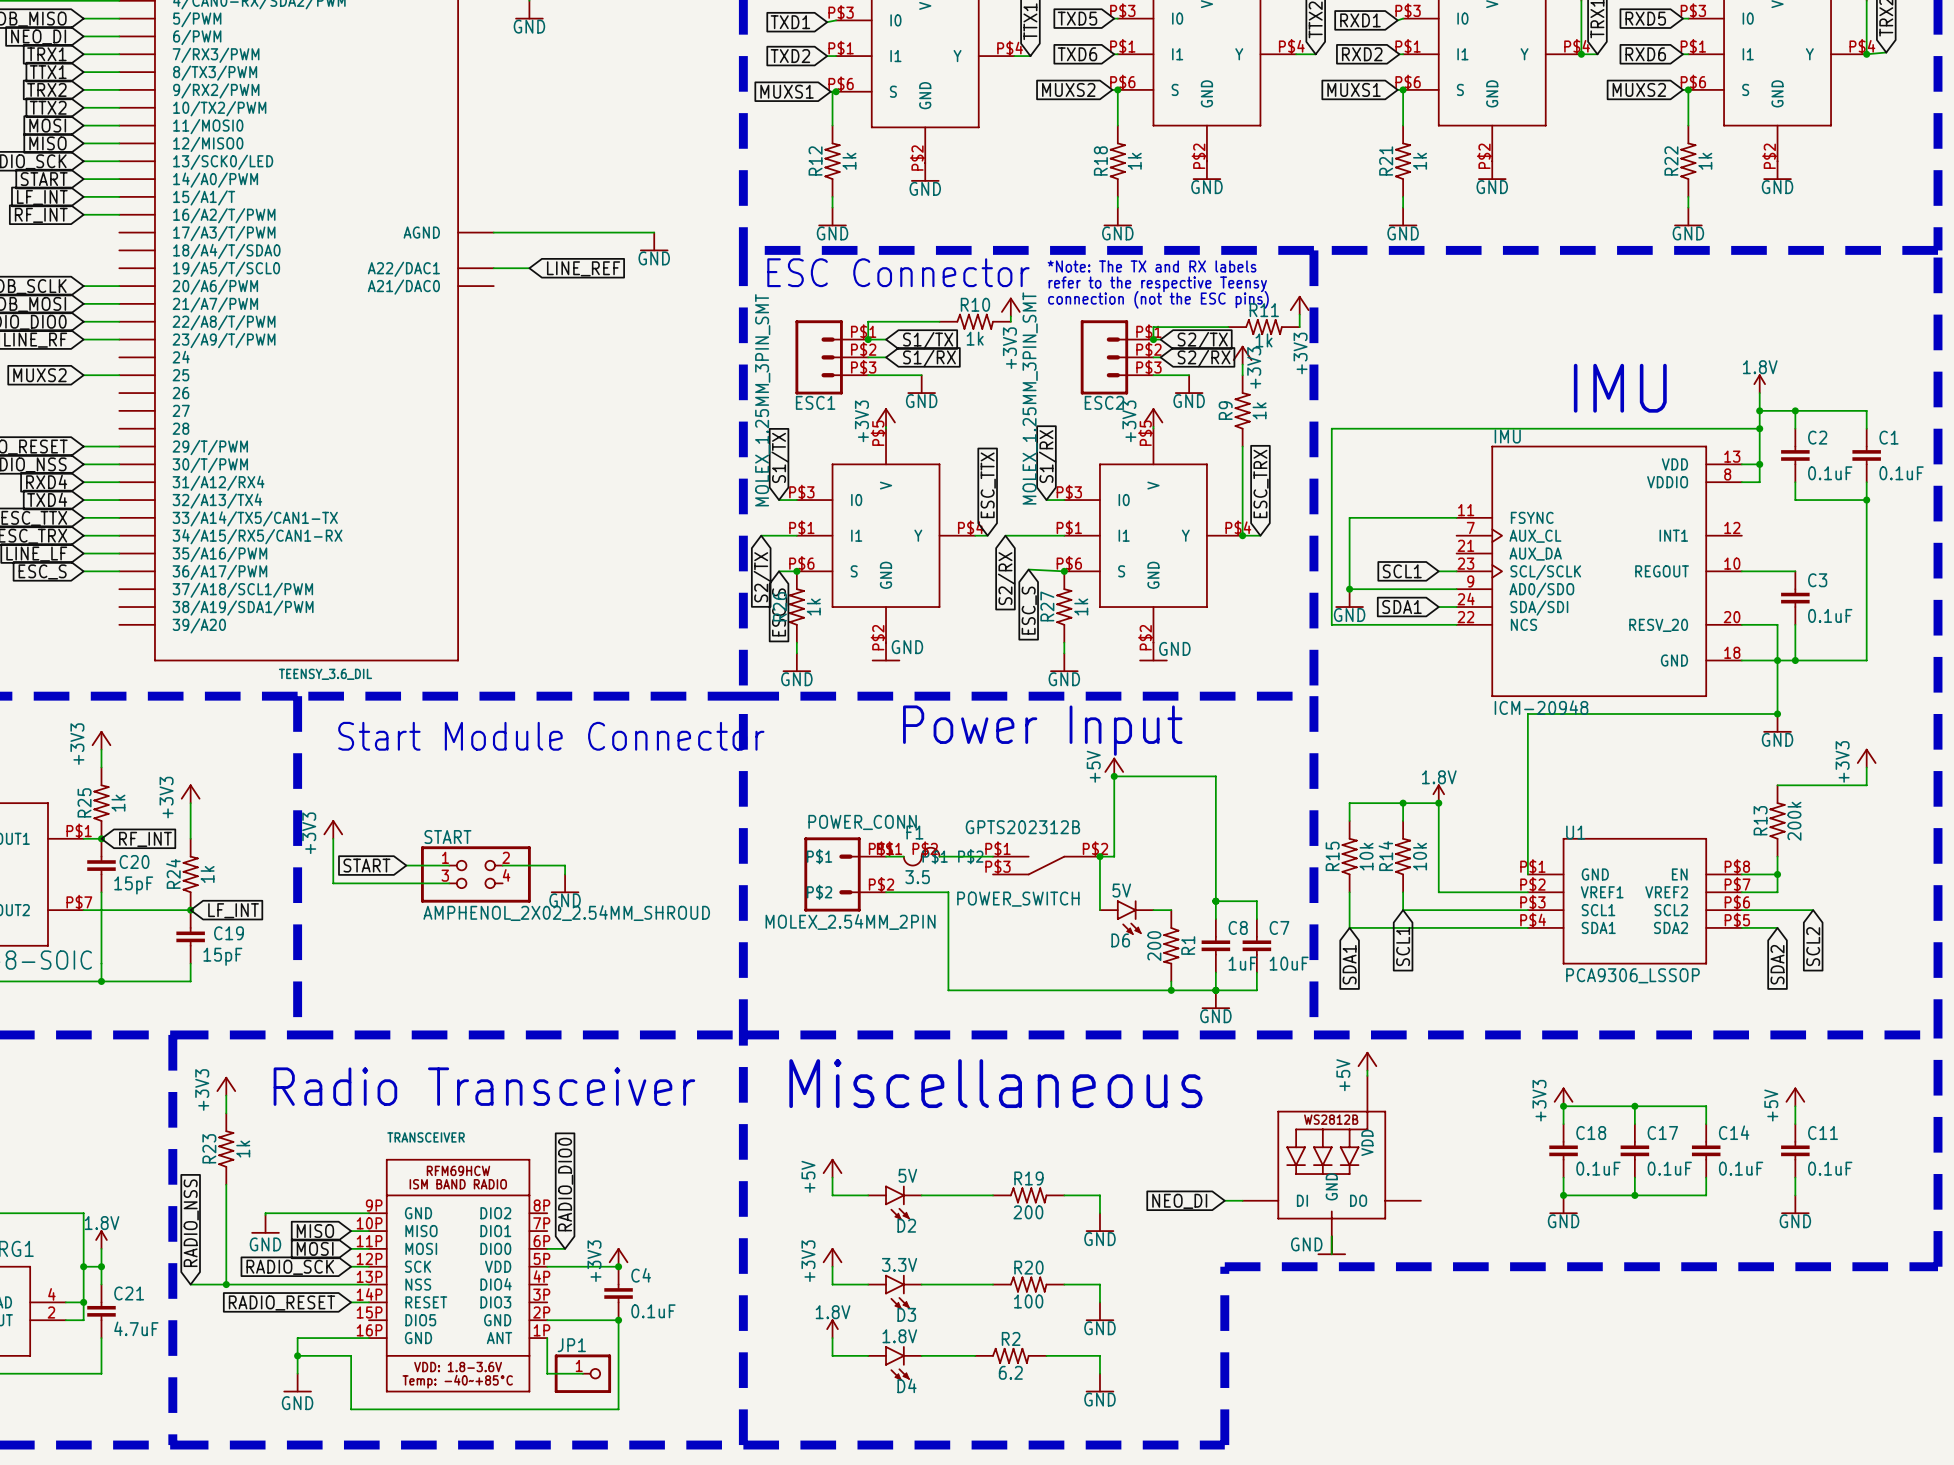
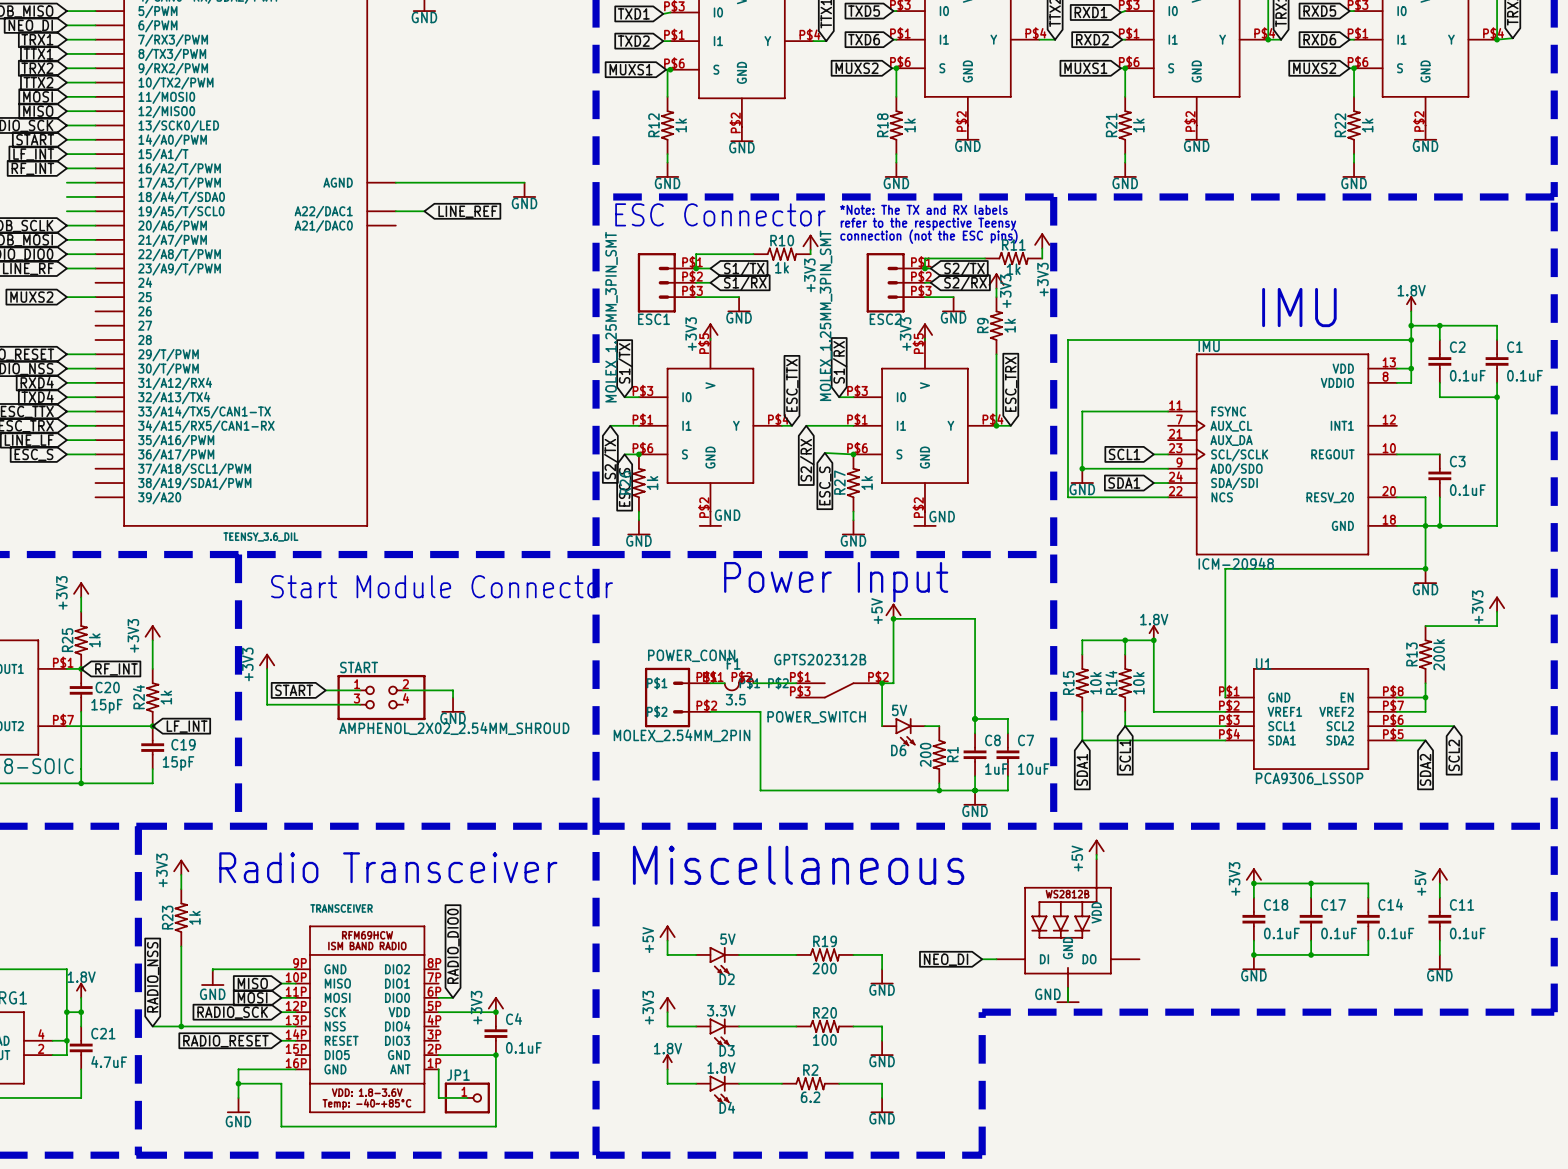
wire: none -> (66, 182) (95, 182)
wire: none -> (66, 196) (95, 196)
wire: none -> (66, 211) (95, 211)

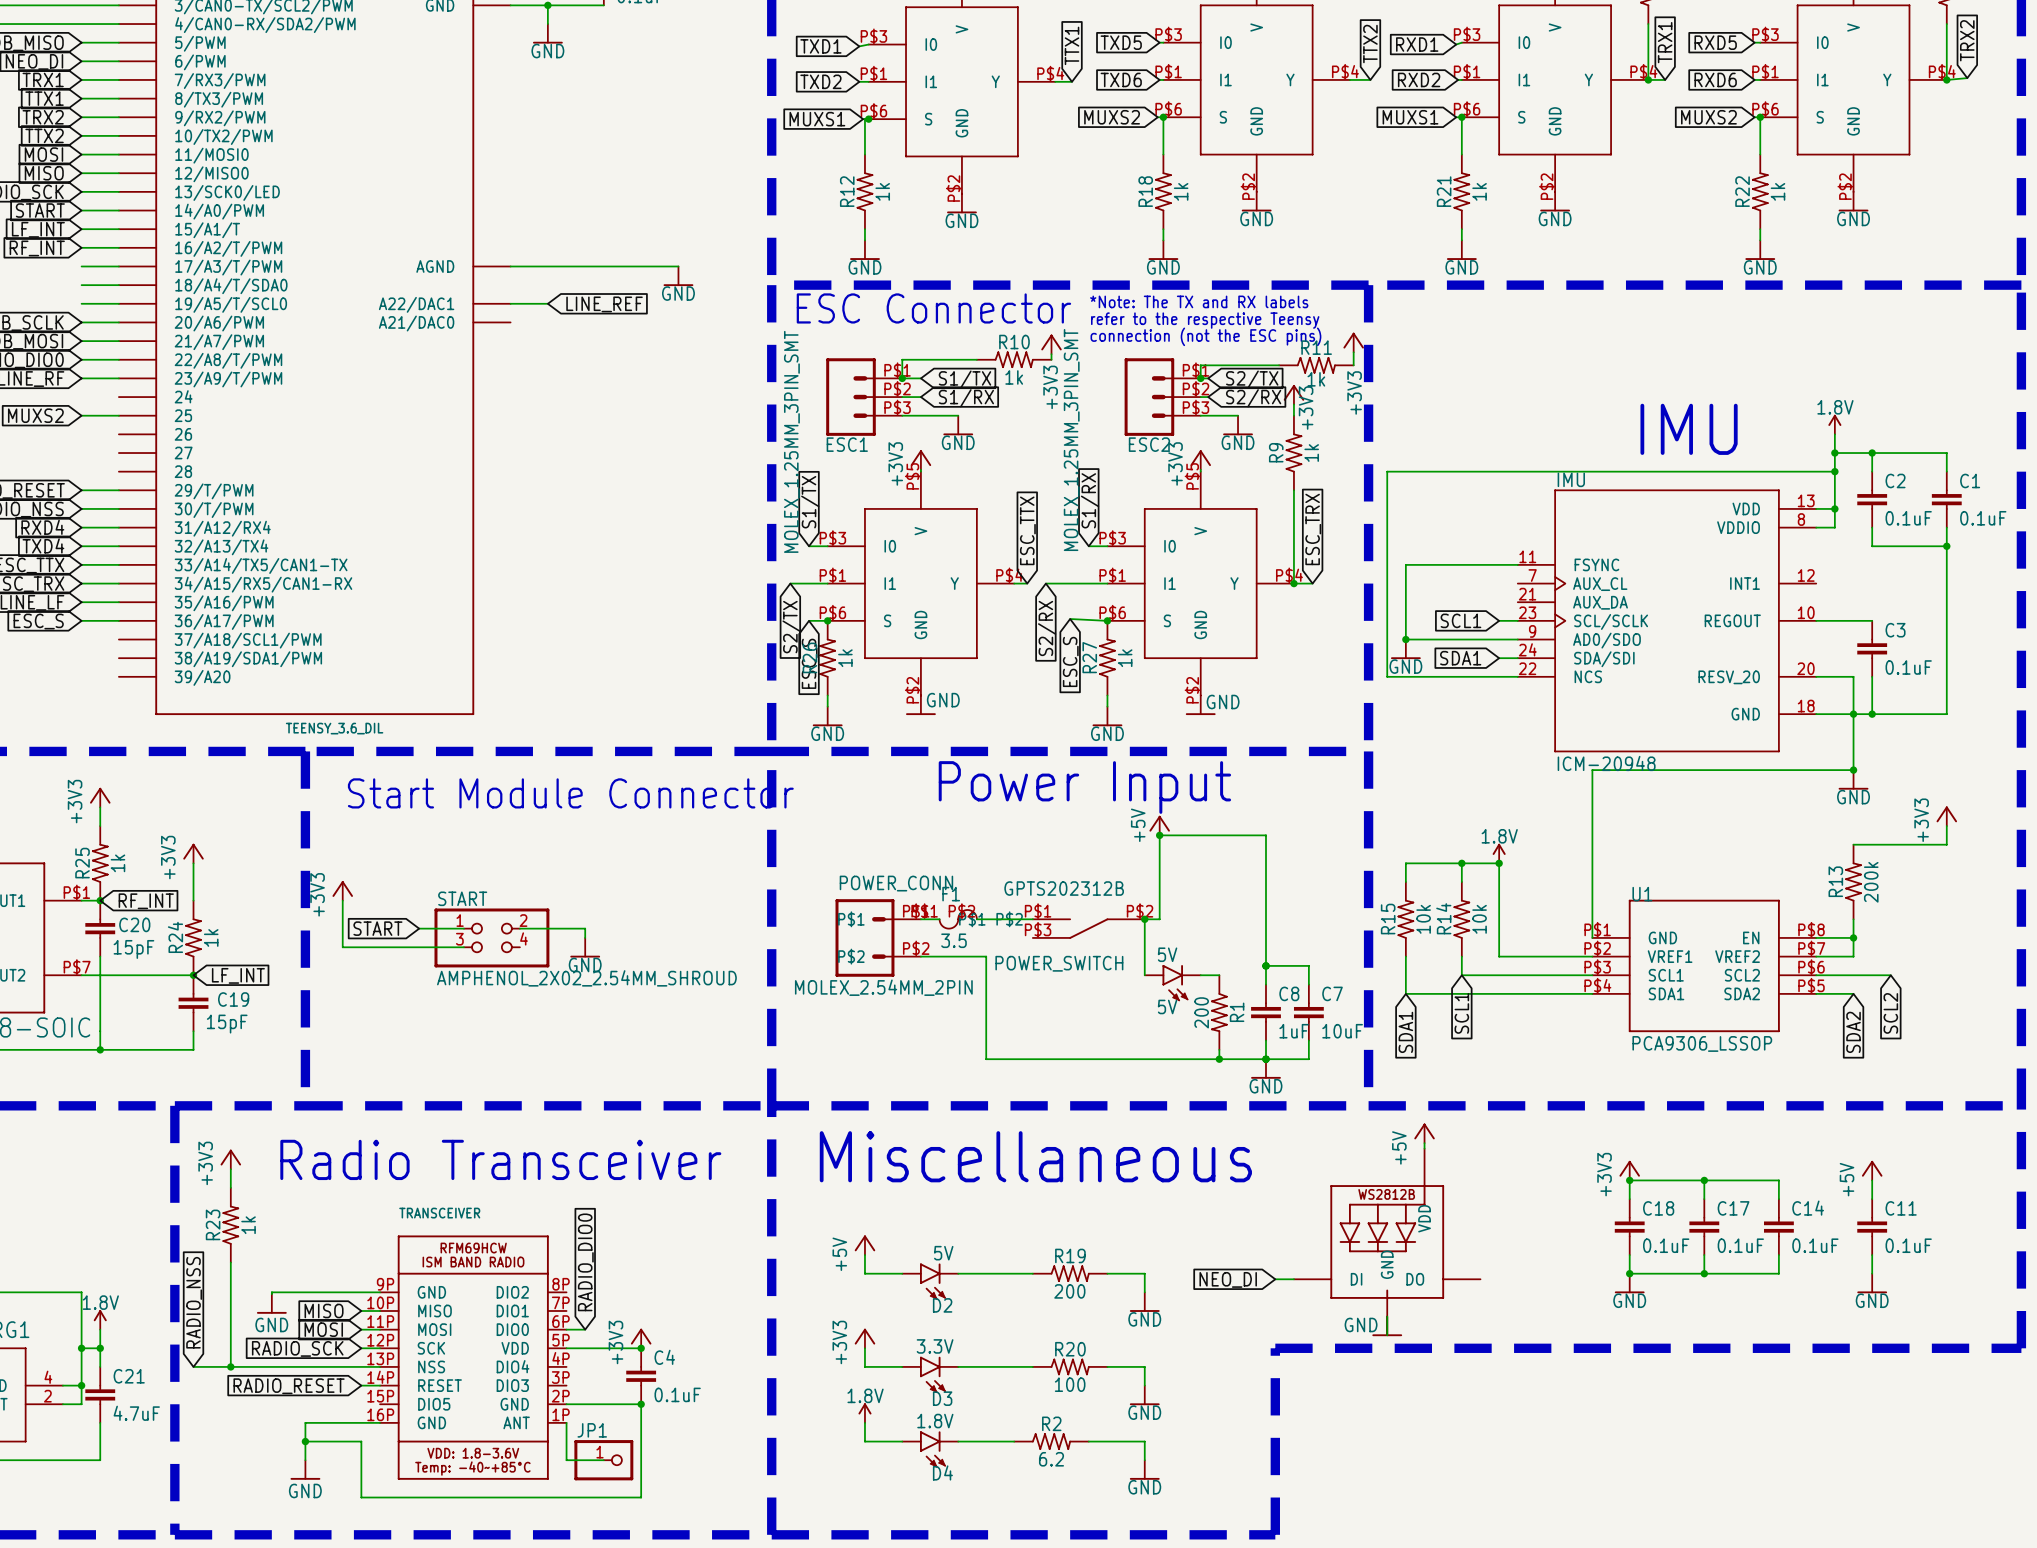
D6 name: D6 (898, 750) -> 5V (1167, 1006)

